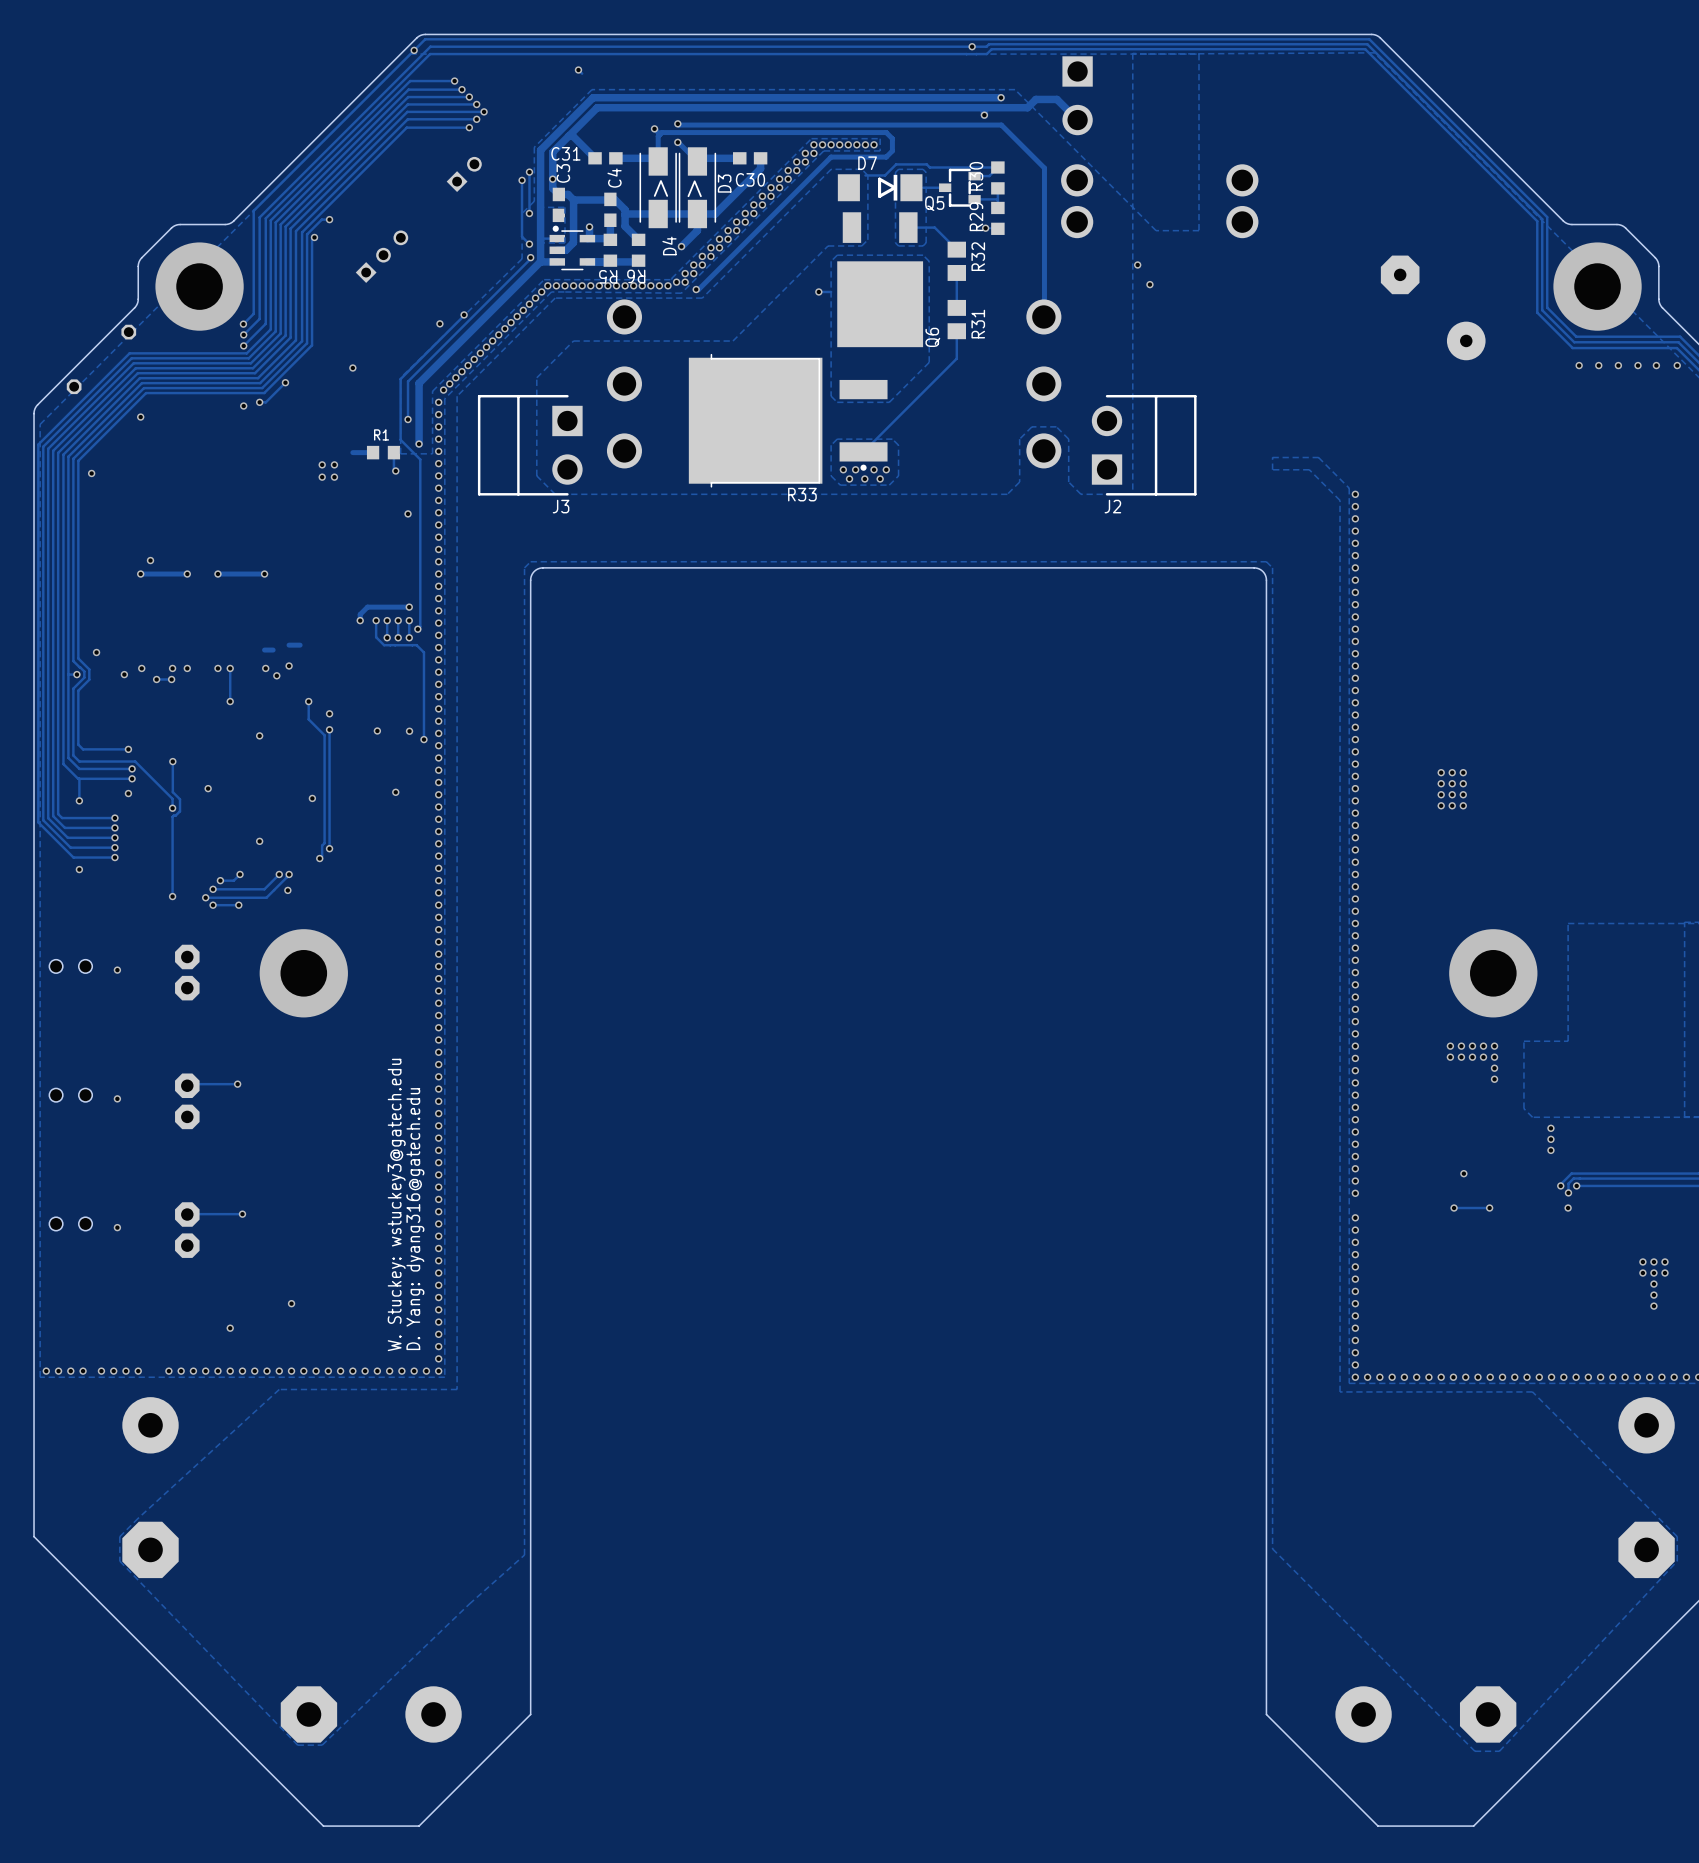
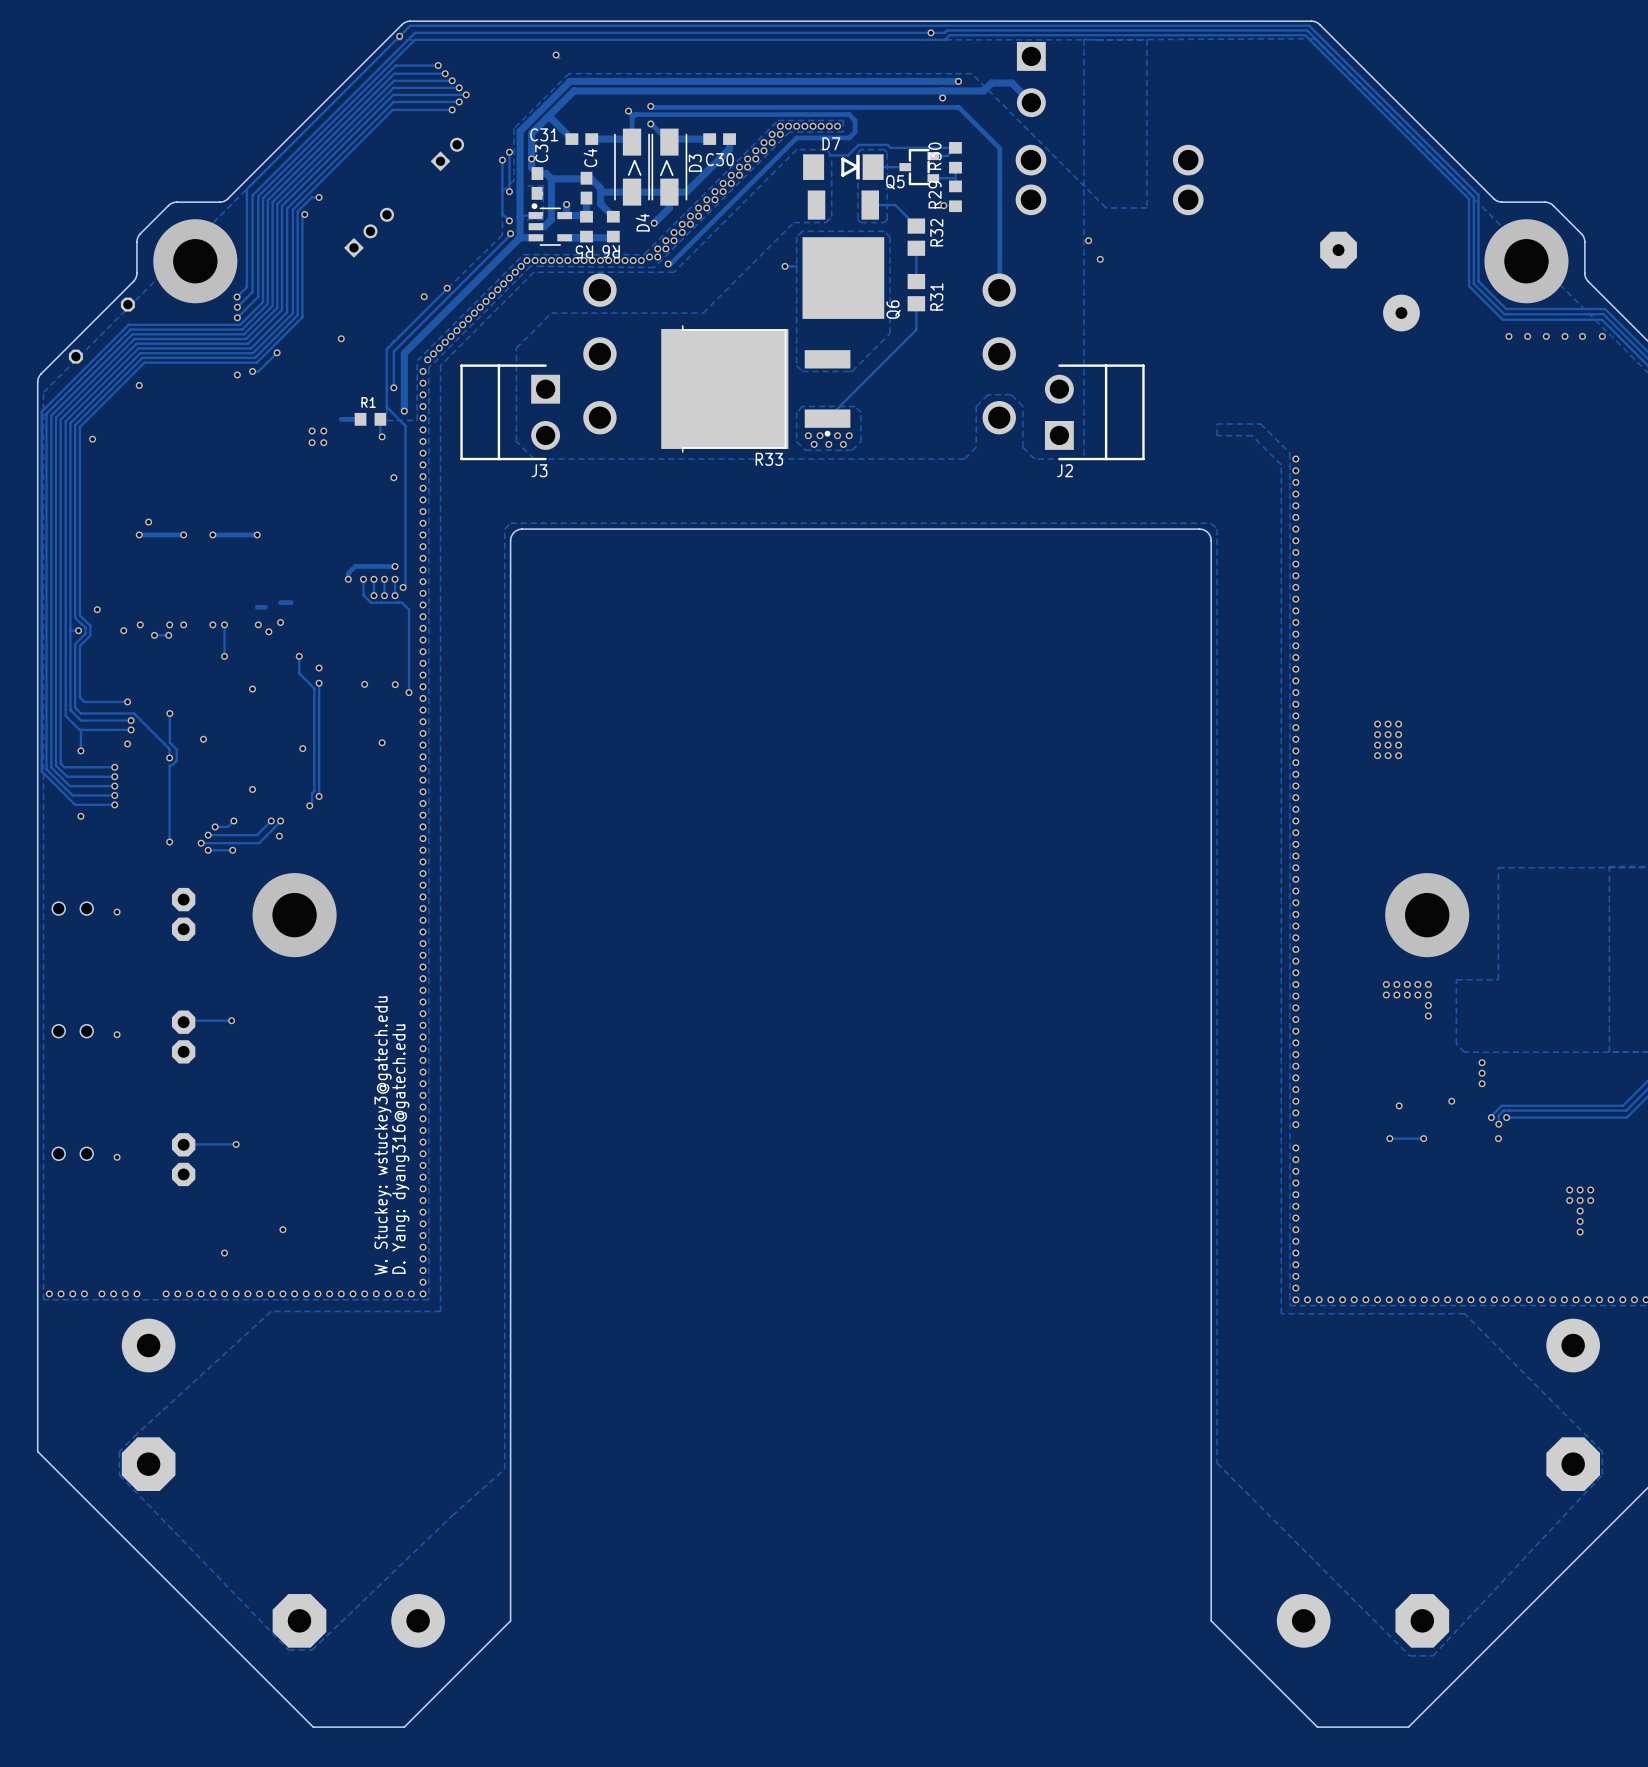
via: none -> (1451, 1101)

